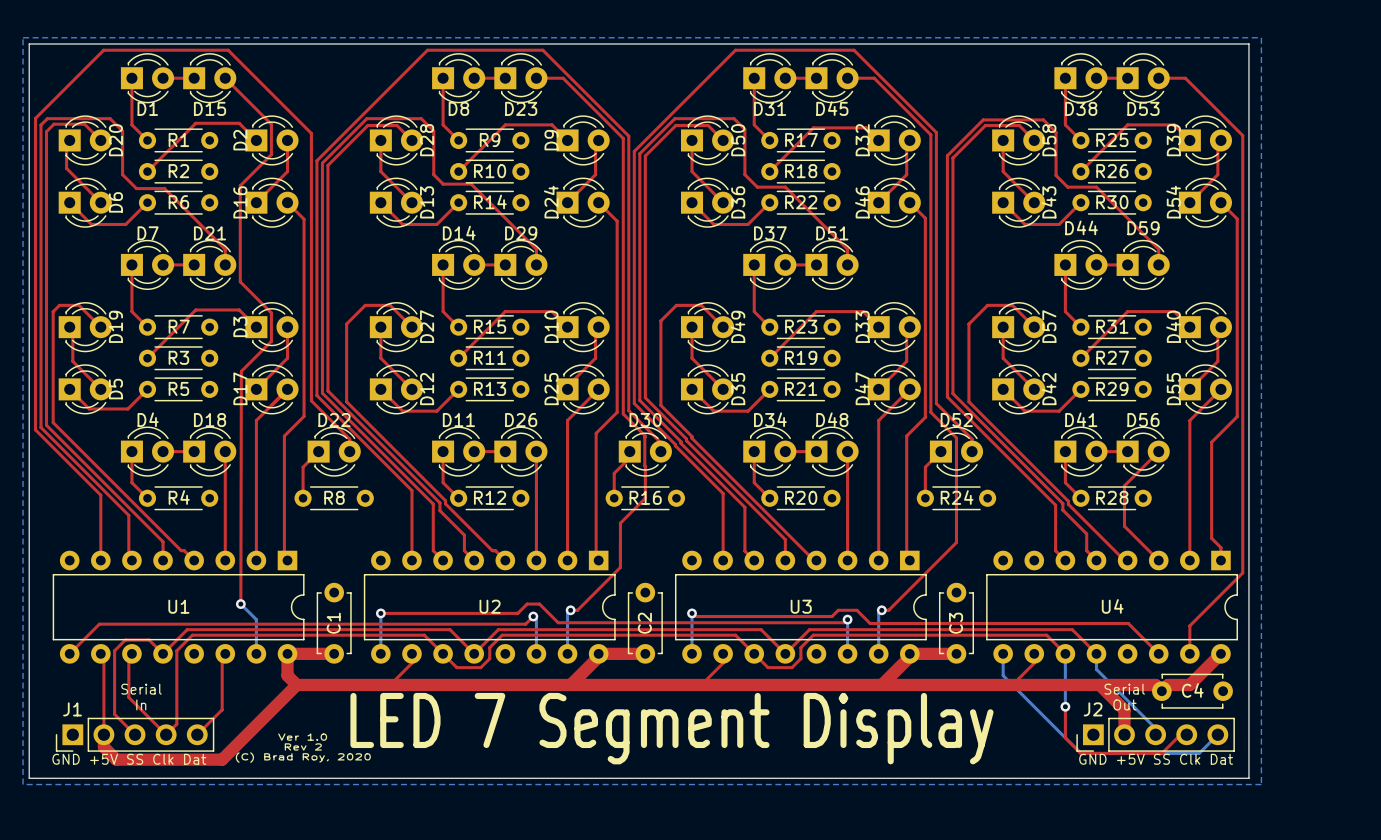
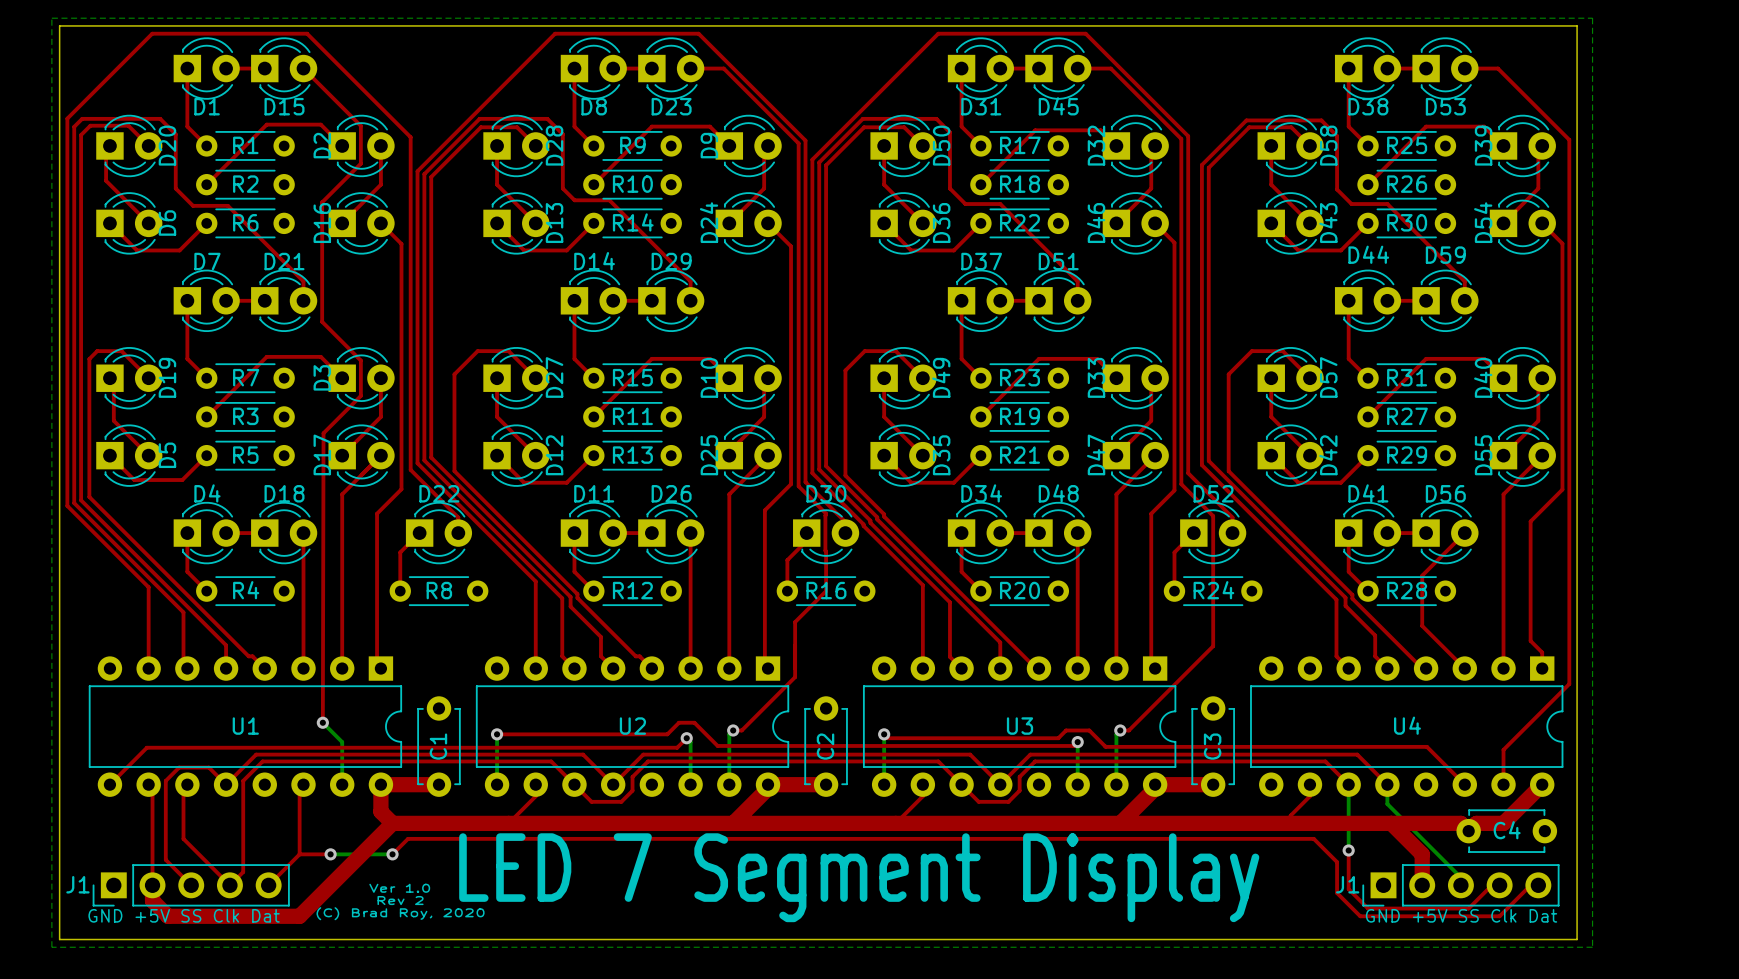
bottom track: (1003, 653) (1003, 675) (1080, 753) (1199, 753) (1217, 734) -> none
text: Serial (141, 689) -> none
text: Serial (1124, 689) -> none
text: In (141, 704) -> none
text: Out (1124, 704) -> none
J1 name position: J1 (72, 709) -> J1 (77, 884)
top track: none -> (299, 854) (330, 854)
bottom track: none -> (330, 854) (392, 854)
via: none -> (330, 854)
top track: none -> (392, 854) (408, 838) (1313, 838) (1337, 862) (1337, 893) (1360, 916) (1499, 916) (1538, 877)
via: none -> (392, 854)
J2 name: J2 (1093, 709) -> J1 (1347, 884)

